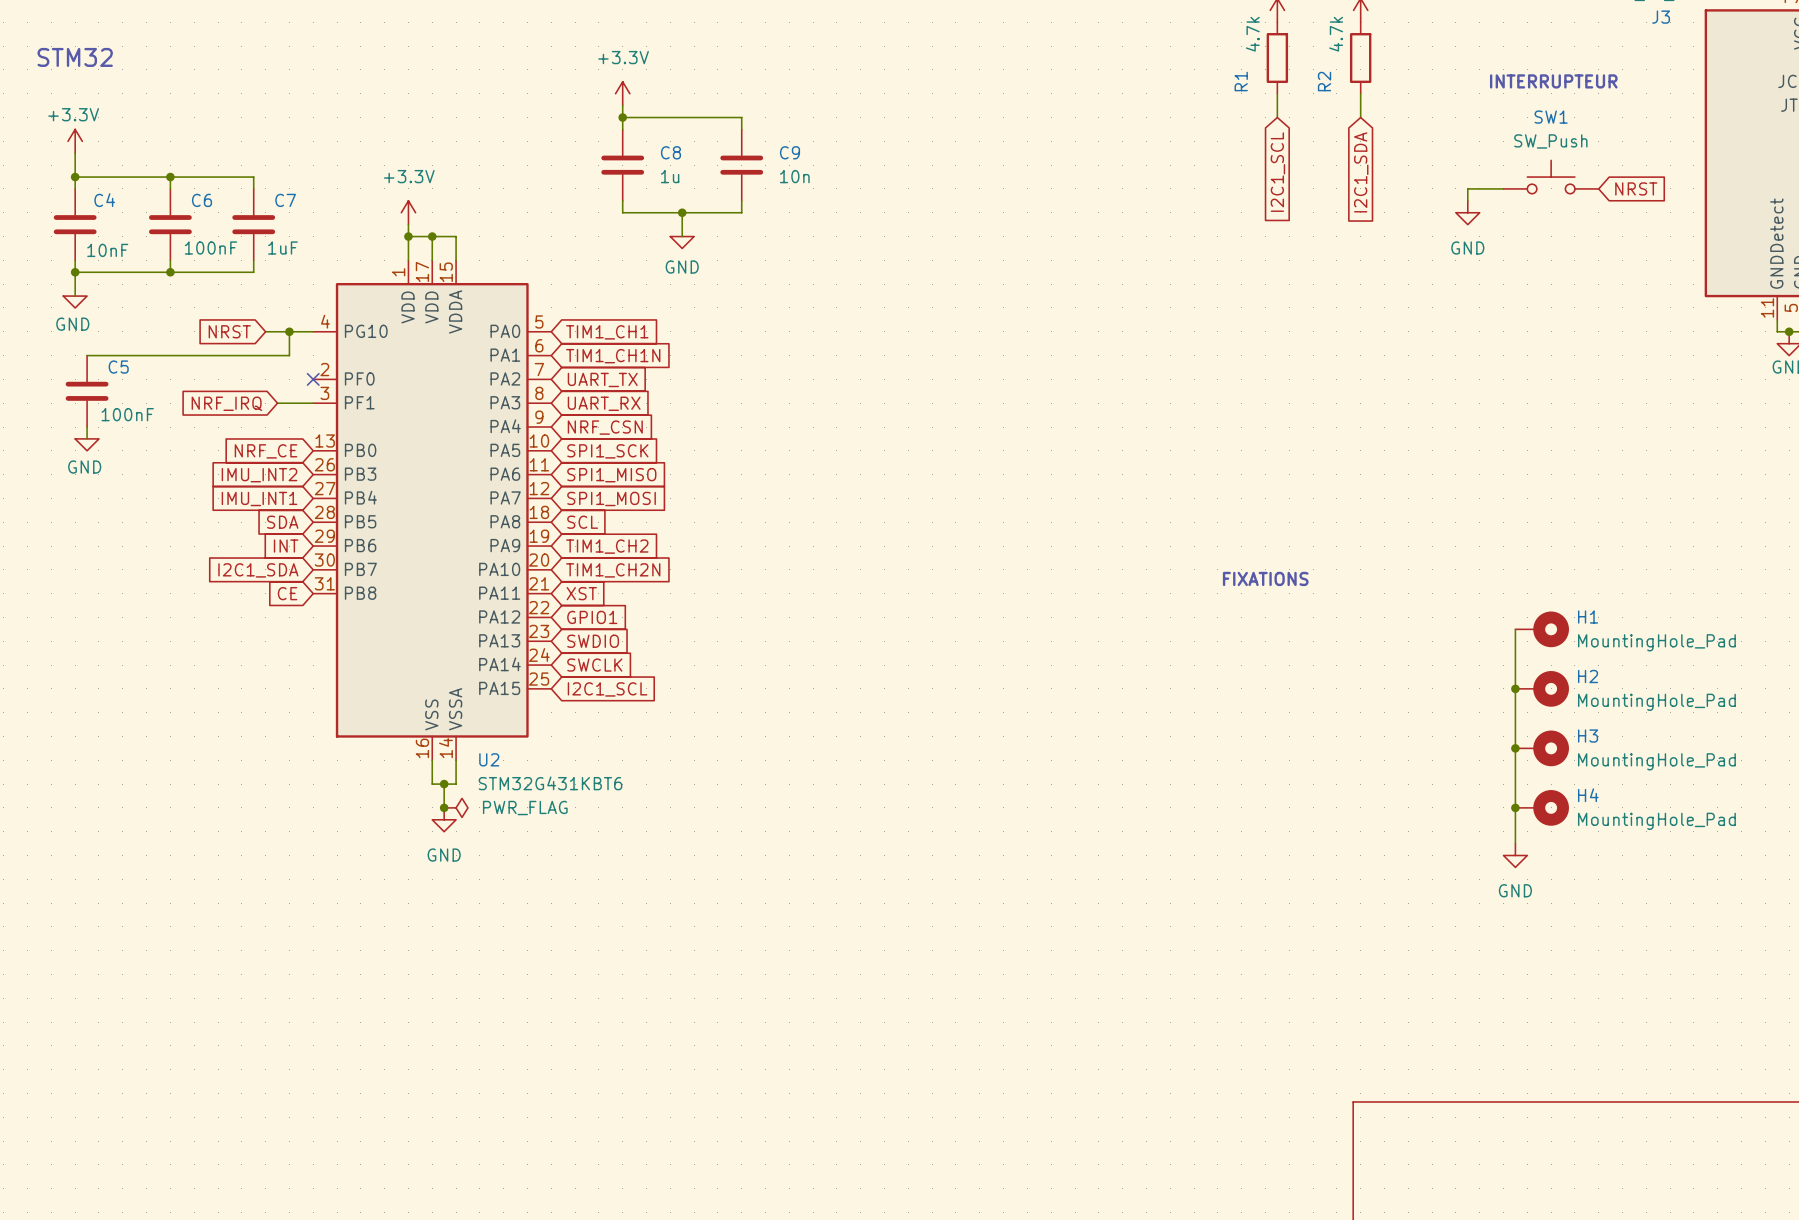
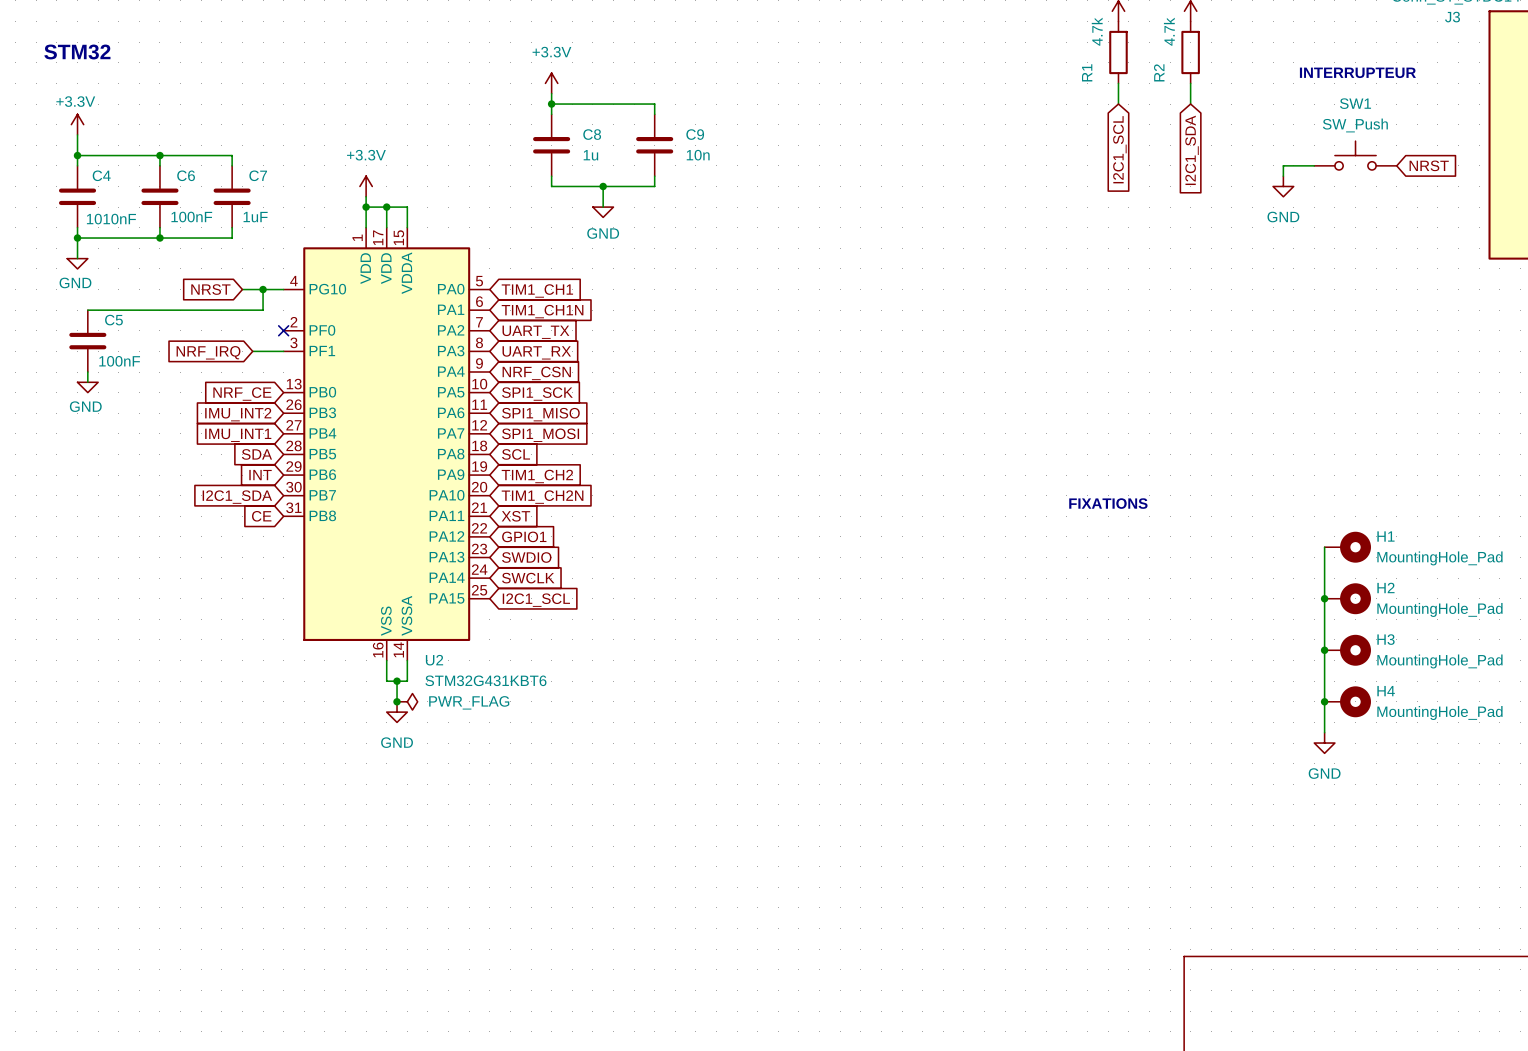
C4 value: 10nF (107, 250) -> 1010nF (111, 219)

